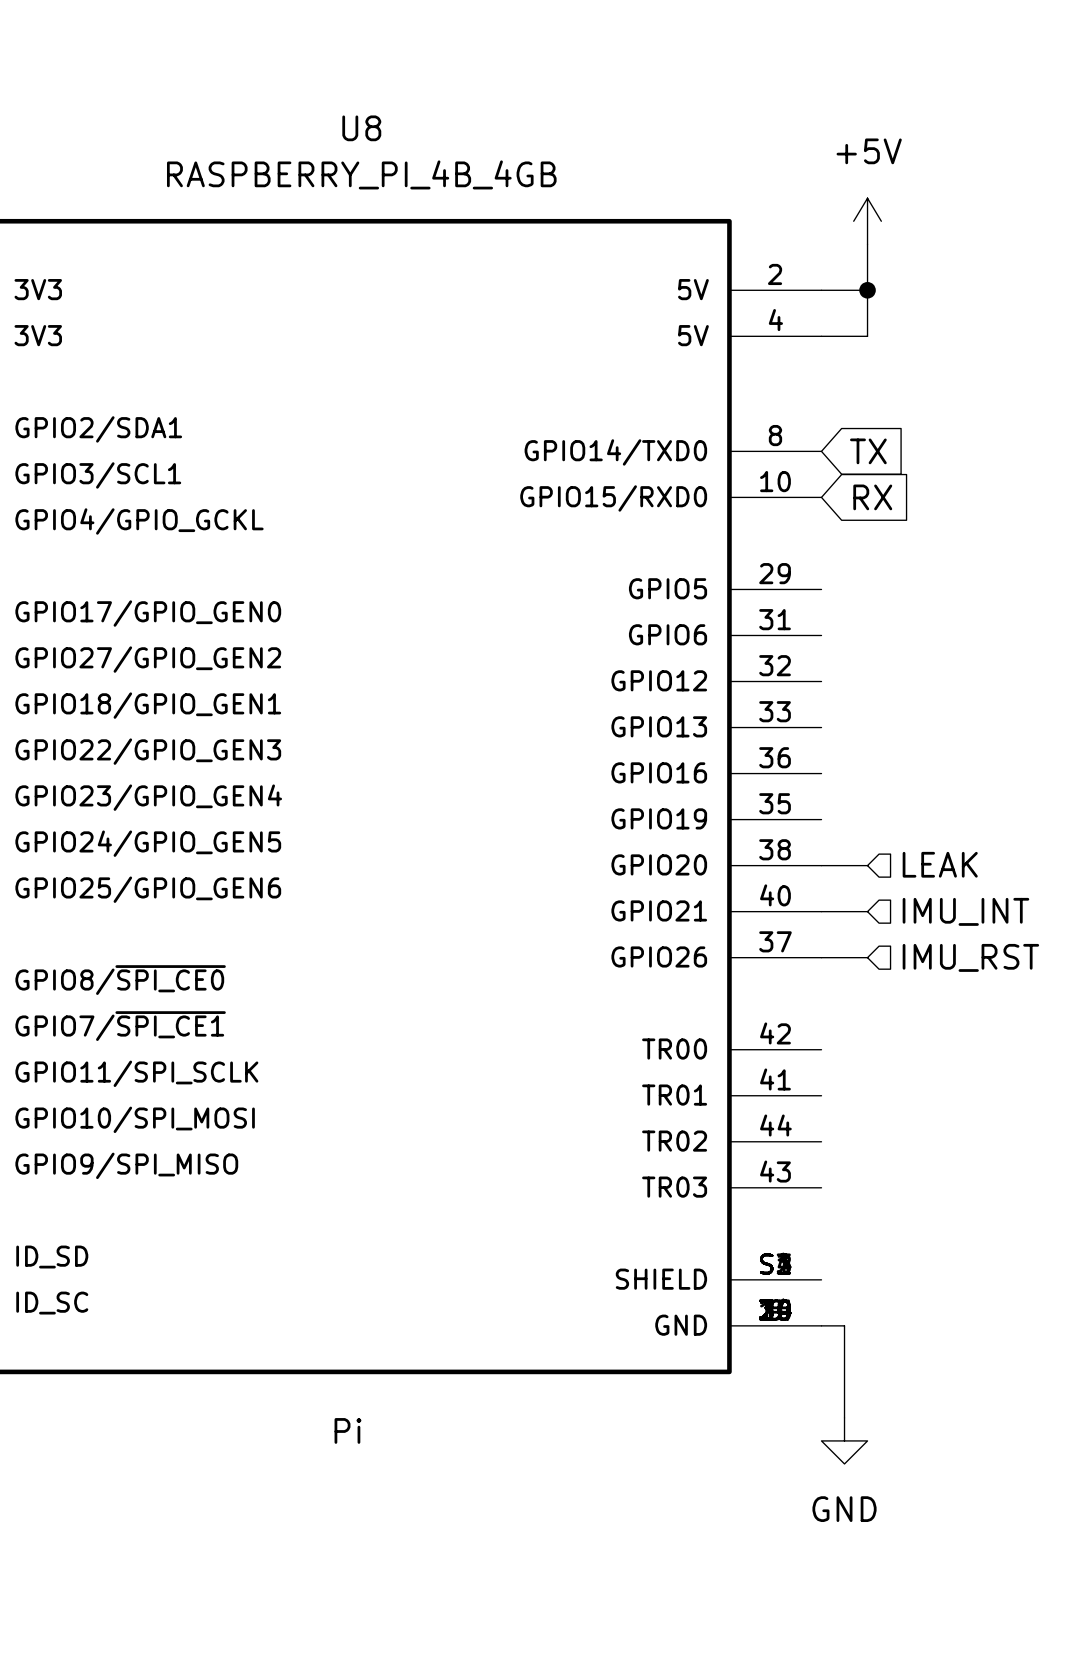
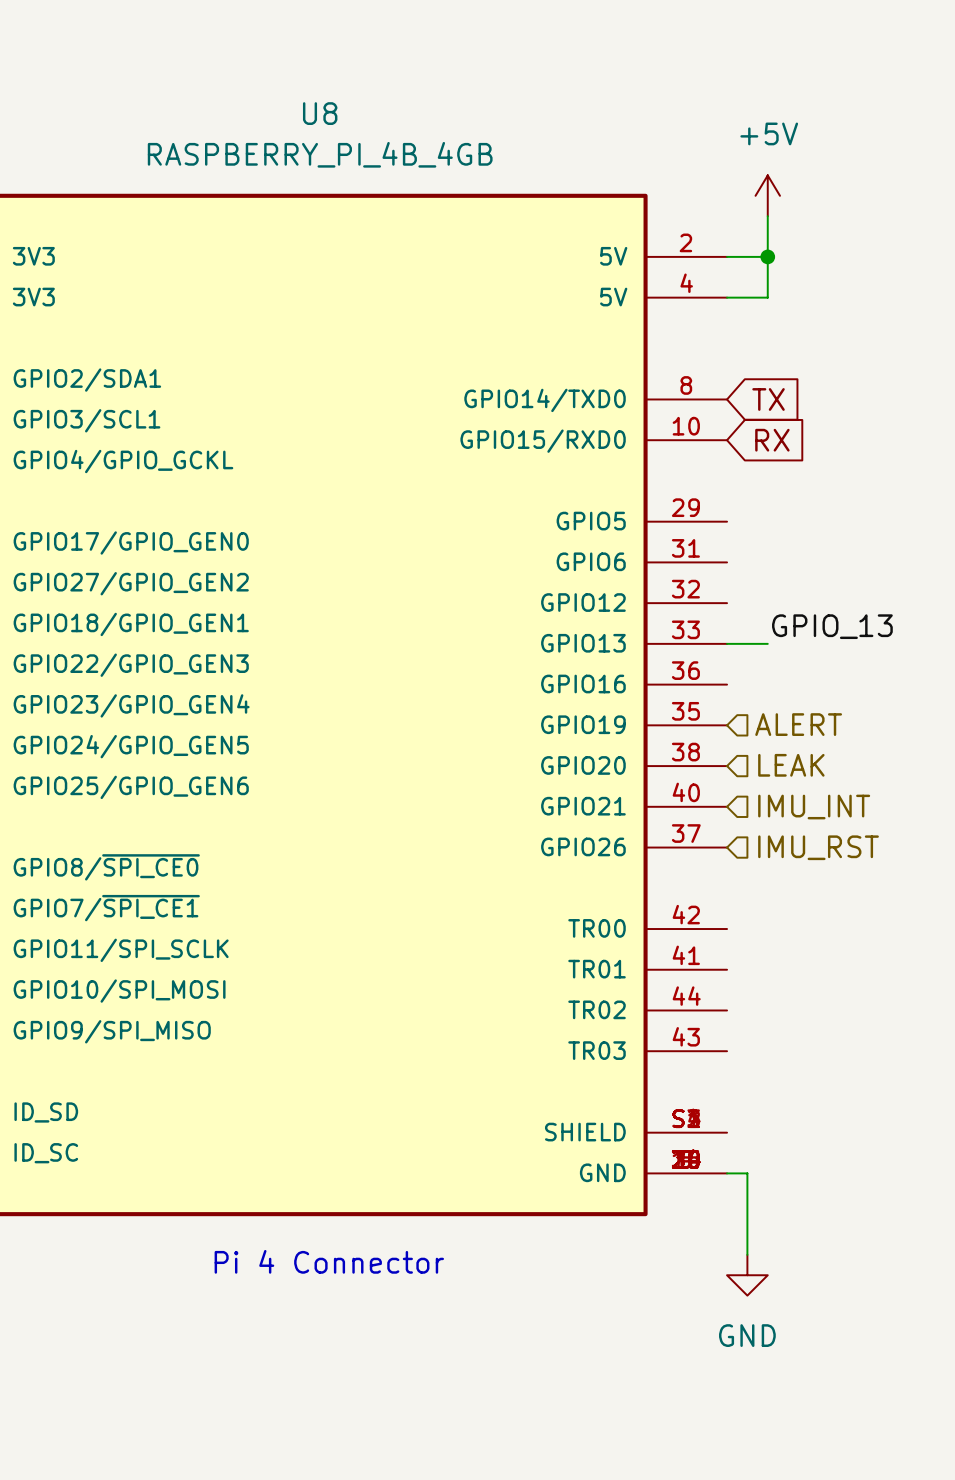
label: none -> GPIO_13 (832, 626)
hierarchical label: none -> ALERT (798, 724)
hierarchical label position: LEAK (940, 864) -> LEAK (791, 765)
wire: (821, 865) (867, 865) -> (727, 643) (767, 643)
wire: (821, 911) (867, 911) -> none
hierarchical label position: IMU_INT (965, 911) -> IMU_INT (814, 807)
wire: (821, 957) (867, 957) -> none
hierarchical label position: IMU_RST (970, 957) -> IMU_RST (818, 847)
text: none -> Pi 4 Connector (329, 1261)
text: Pi (347, 1430) -> none

